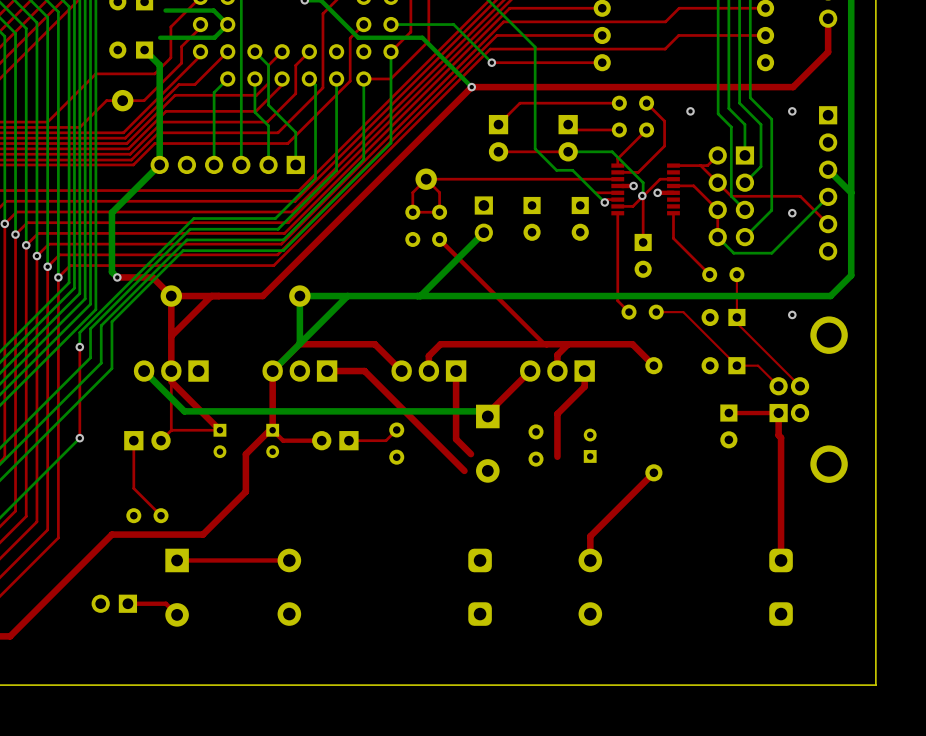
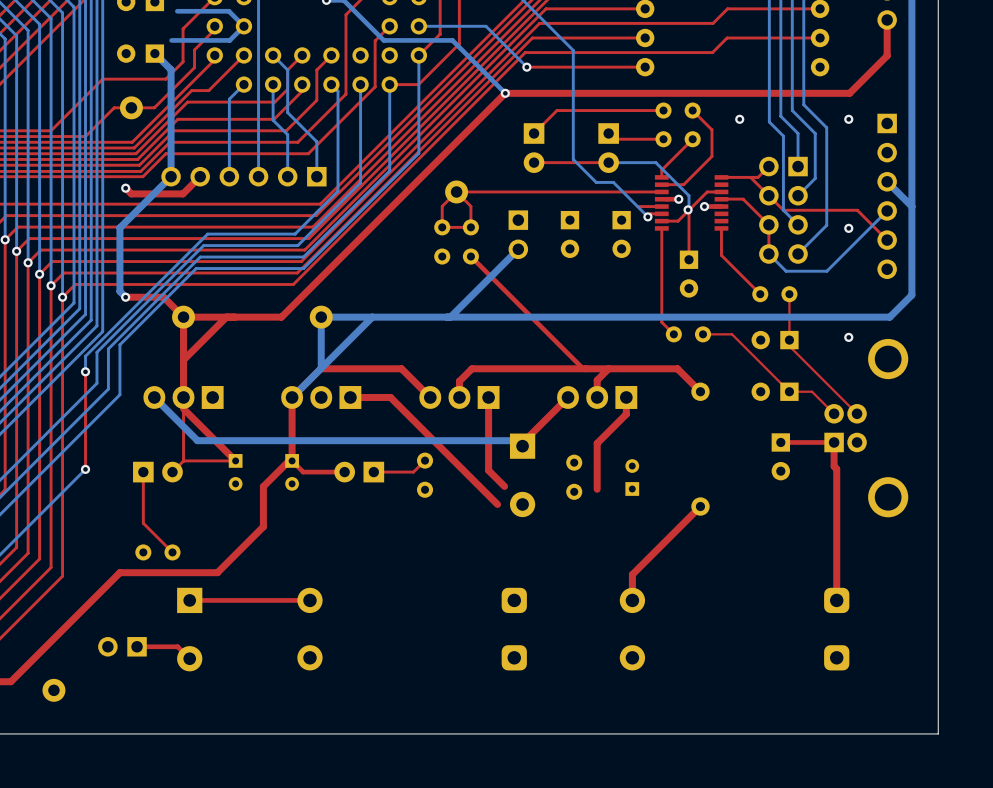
top track: none -> (200, 176) (183, 193) (131, 193) (125, 188)
via: none -> (125, 188)
part: none -> (53, 690)

